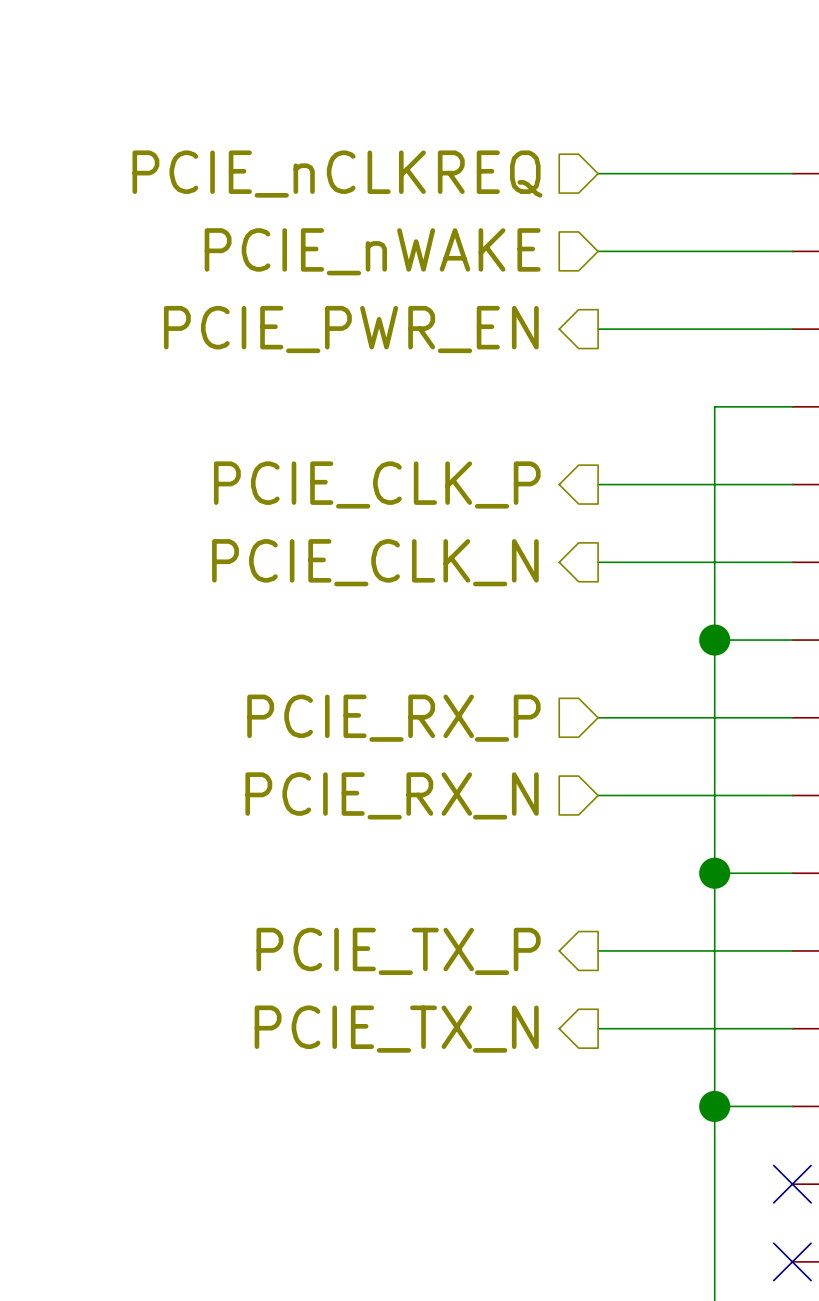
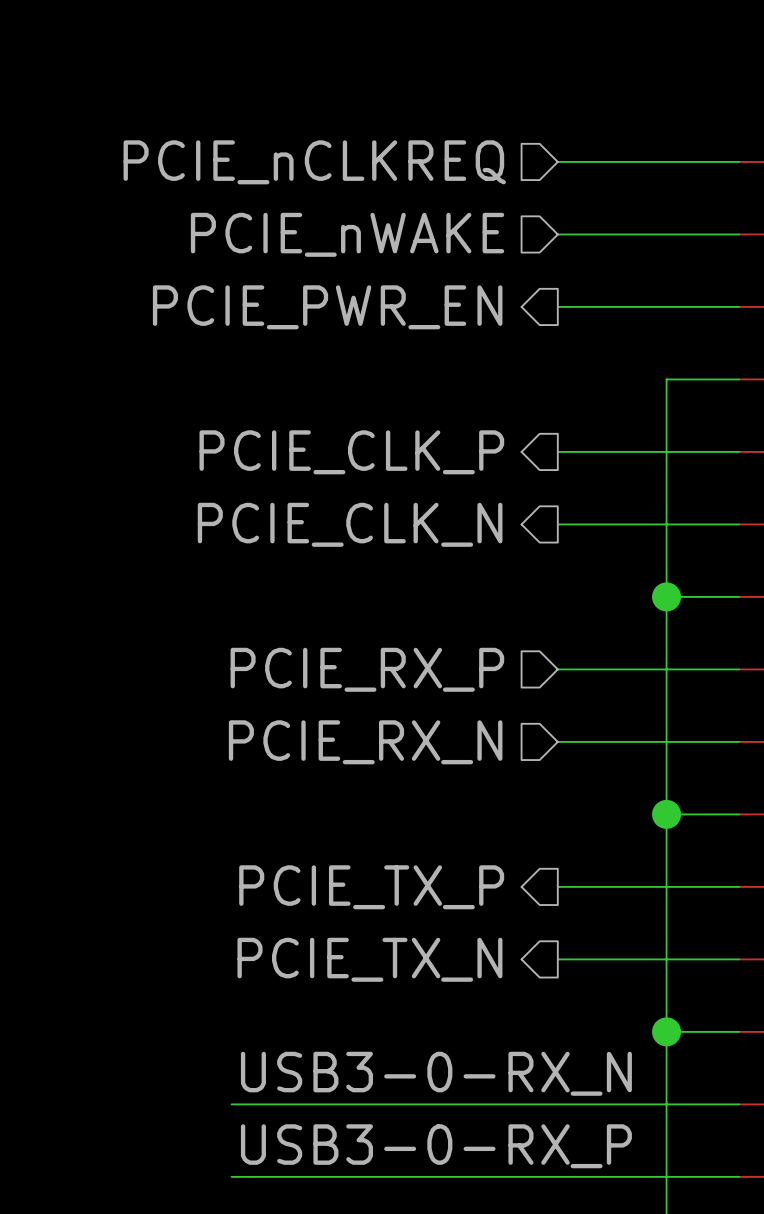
label: none -> USB3-0-RX_N (436, 1073)
wire: none -> (231, 1104) (739, 1104)
no-connect mark: (792, 1184) -> none
label: none -> USB3-0-RX_P (436, 1146)
wire: none -> (231, 1176) (739, 1176)
no-connect mark: (792, 1261) -> none

